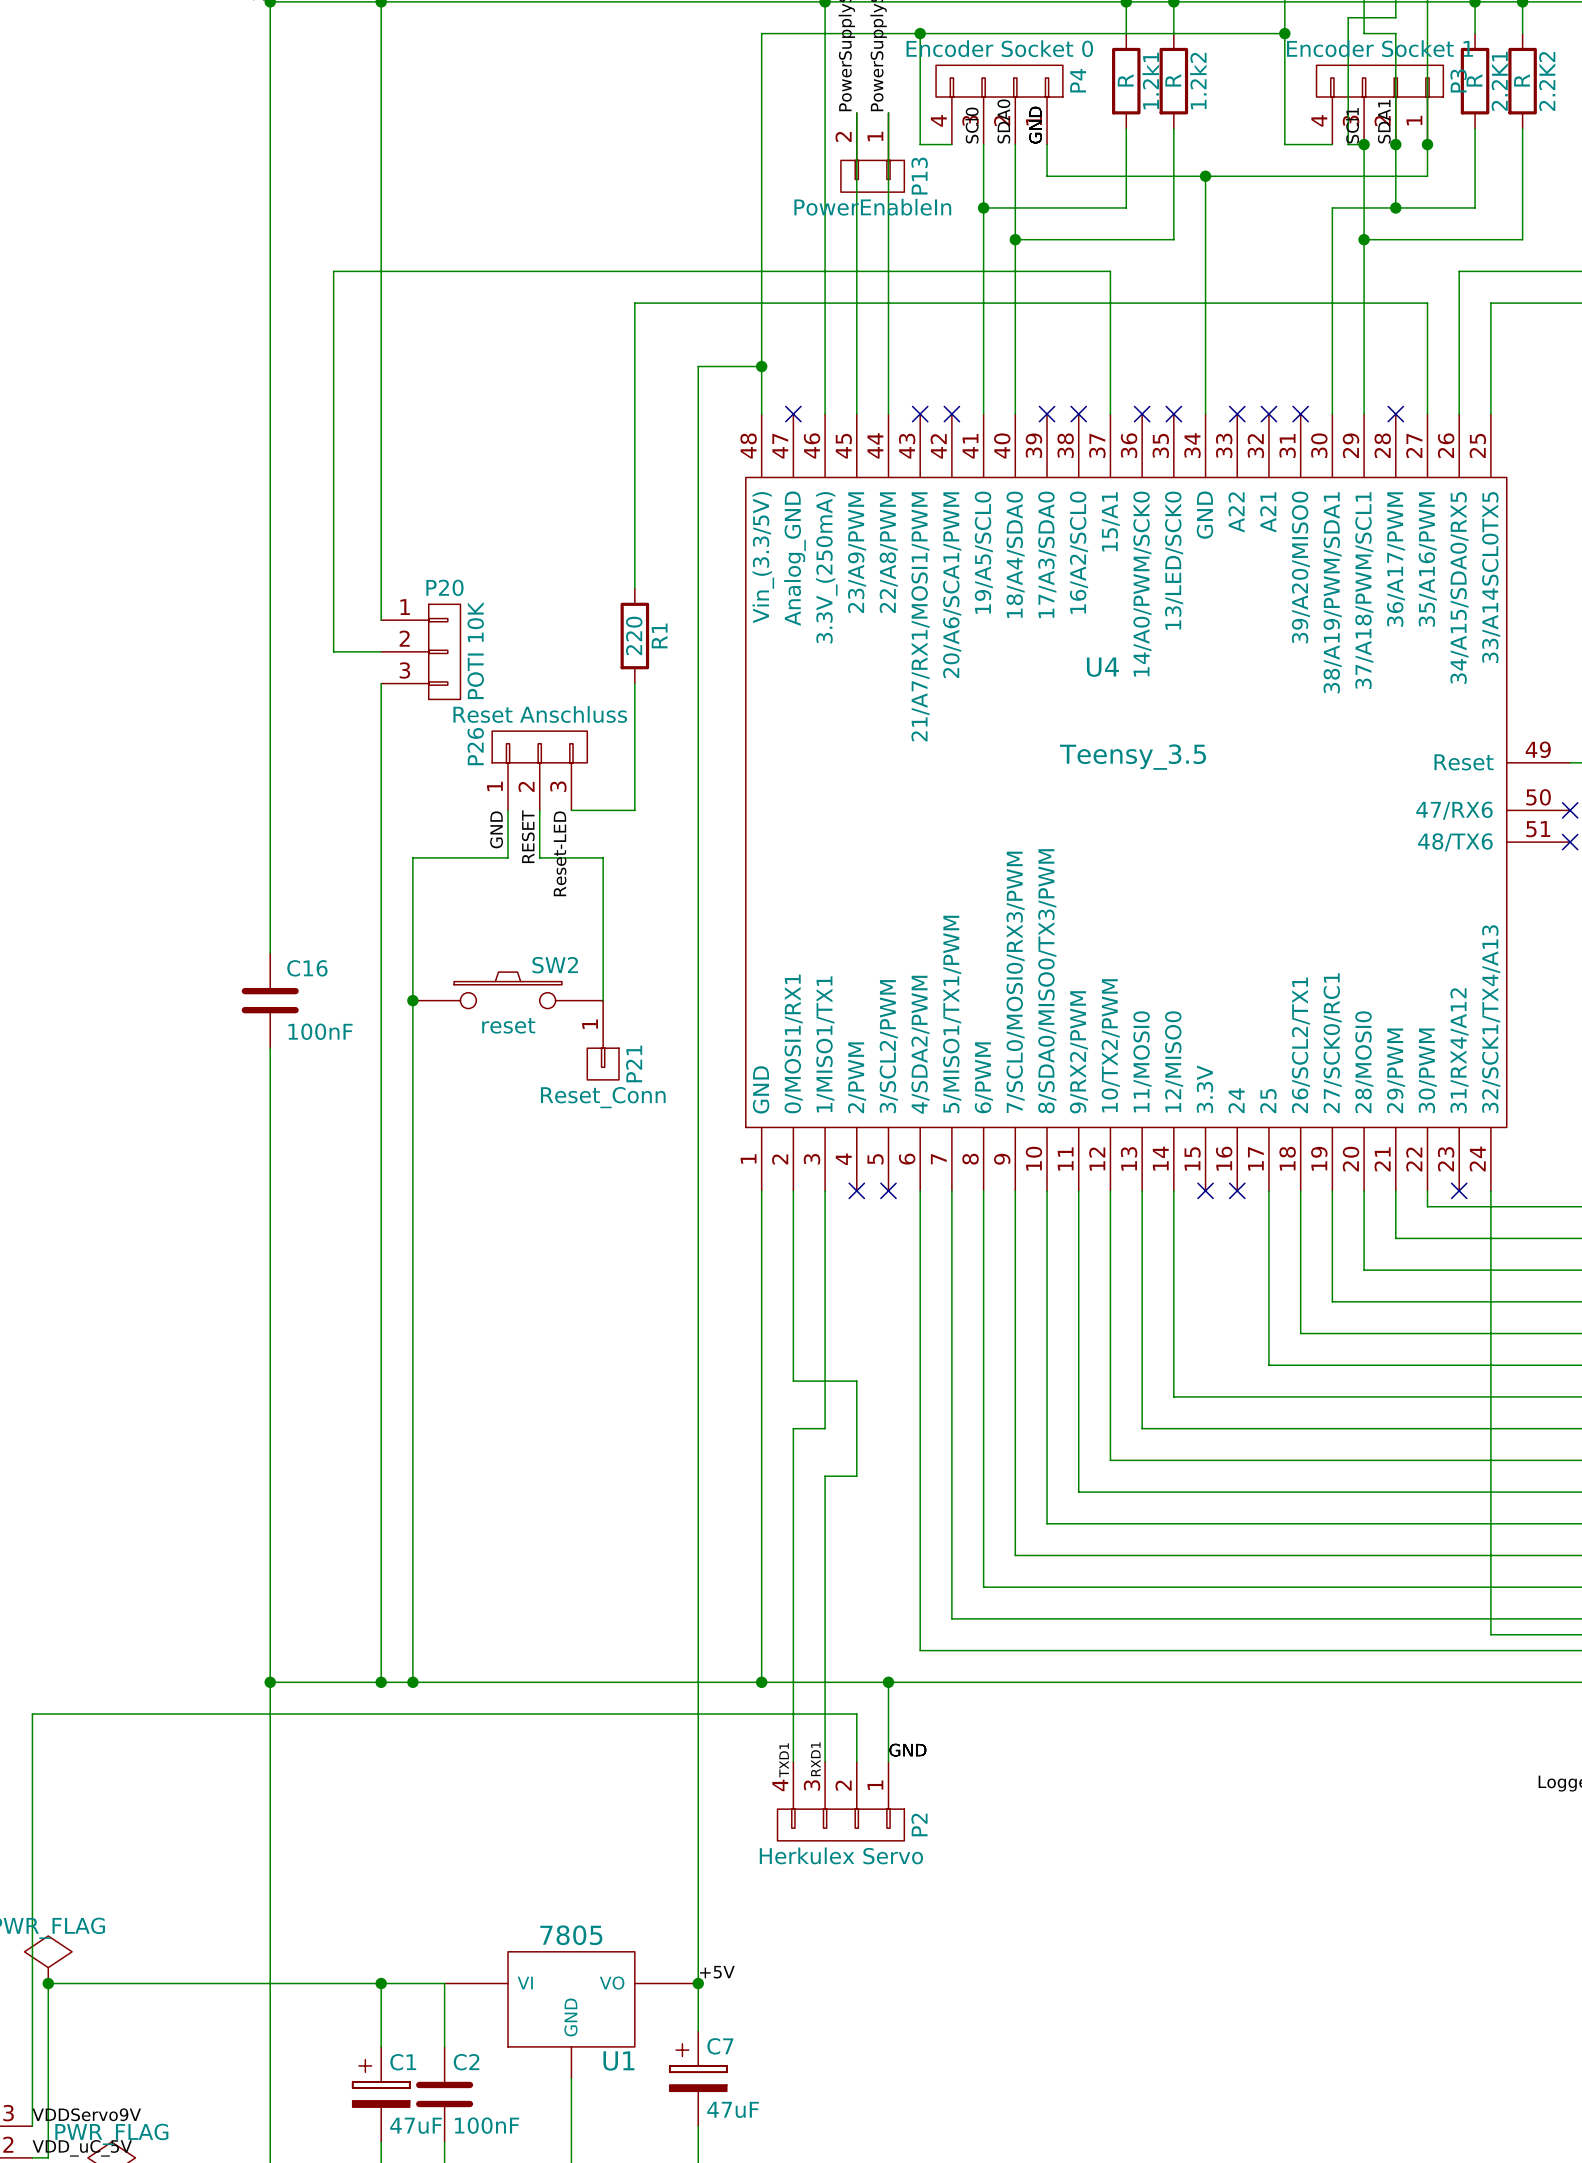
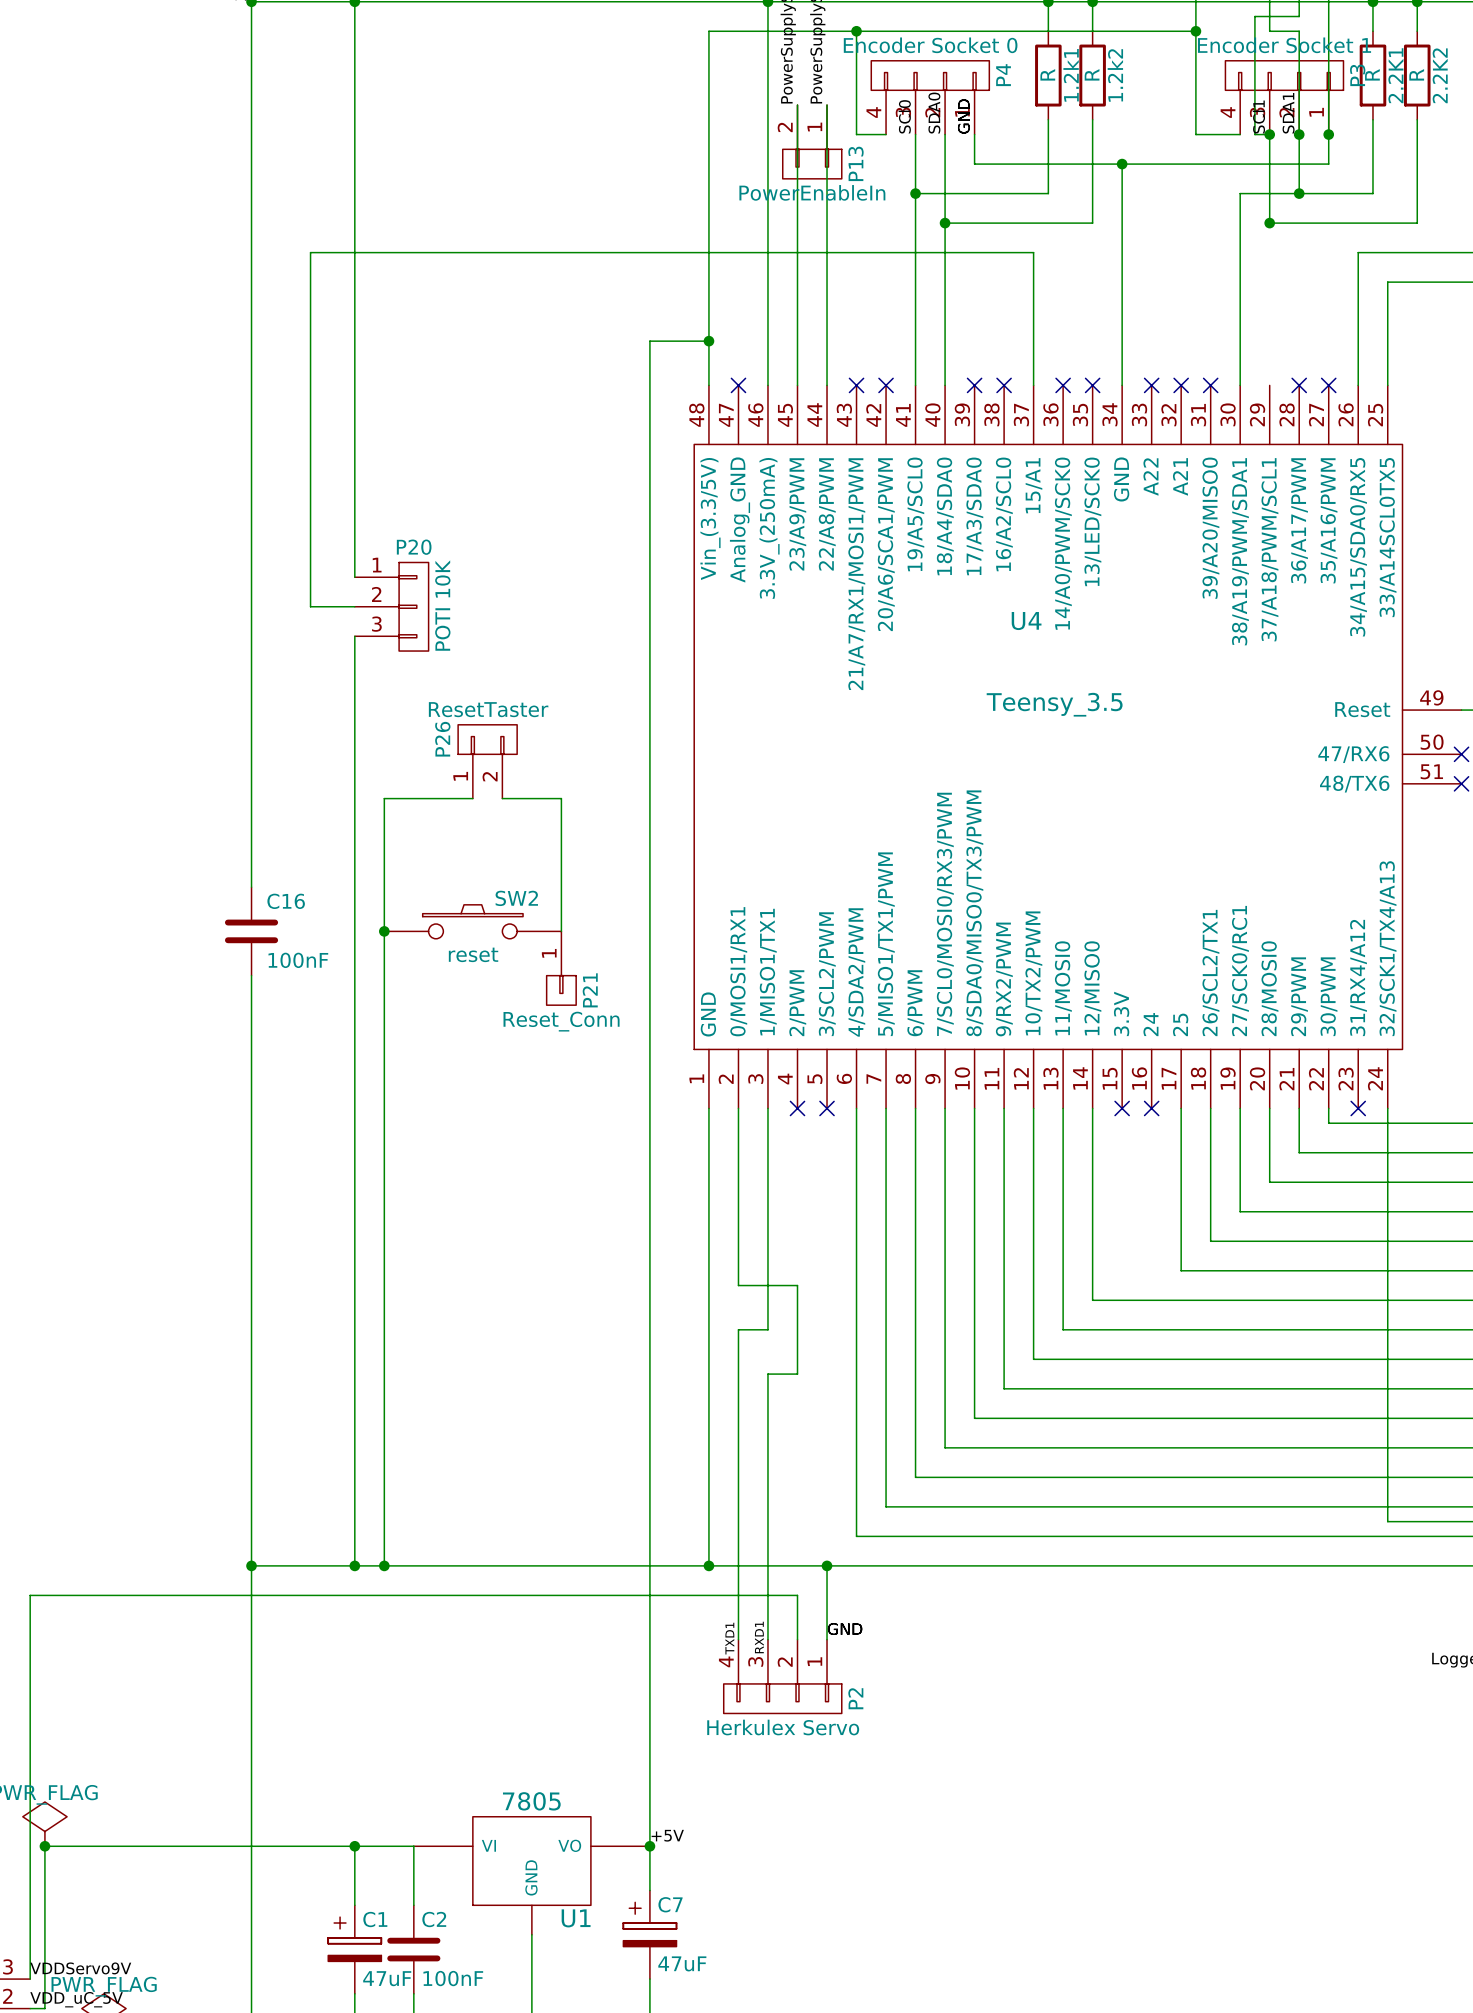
wire: (1364, 239) (1364, 414) -> none
wire: (1427, 414) (1427, 303) (634, 303) (634, 588) -> none
no-connect mark: none -> (1328, 385)
R1: 220 (634, 636) -> none
wire: (634, 683) (634, 810) (571, 810) -> none
P26 value: Reset Anschluss (540, 714) -> ResetTaster (488, 709)
P26 symbol: [492, 731, 588, 811] -> [458, 724, 518, 799]
label: GND (496, 829) -> none
label: RESET (528, 836) -> none
label: Reset-LED (560, 853) -> none

